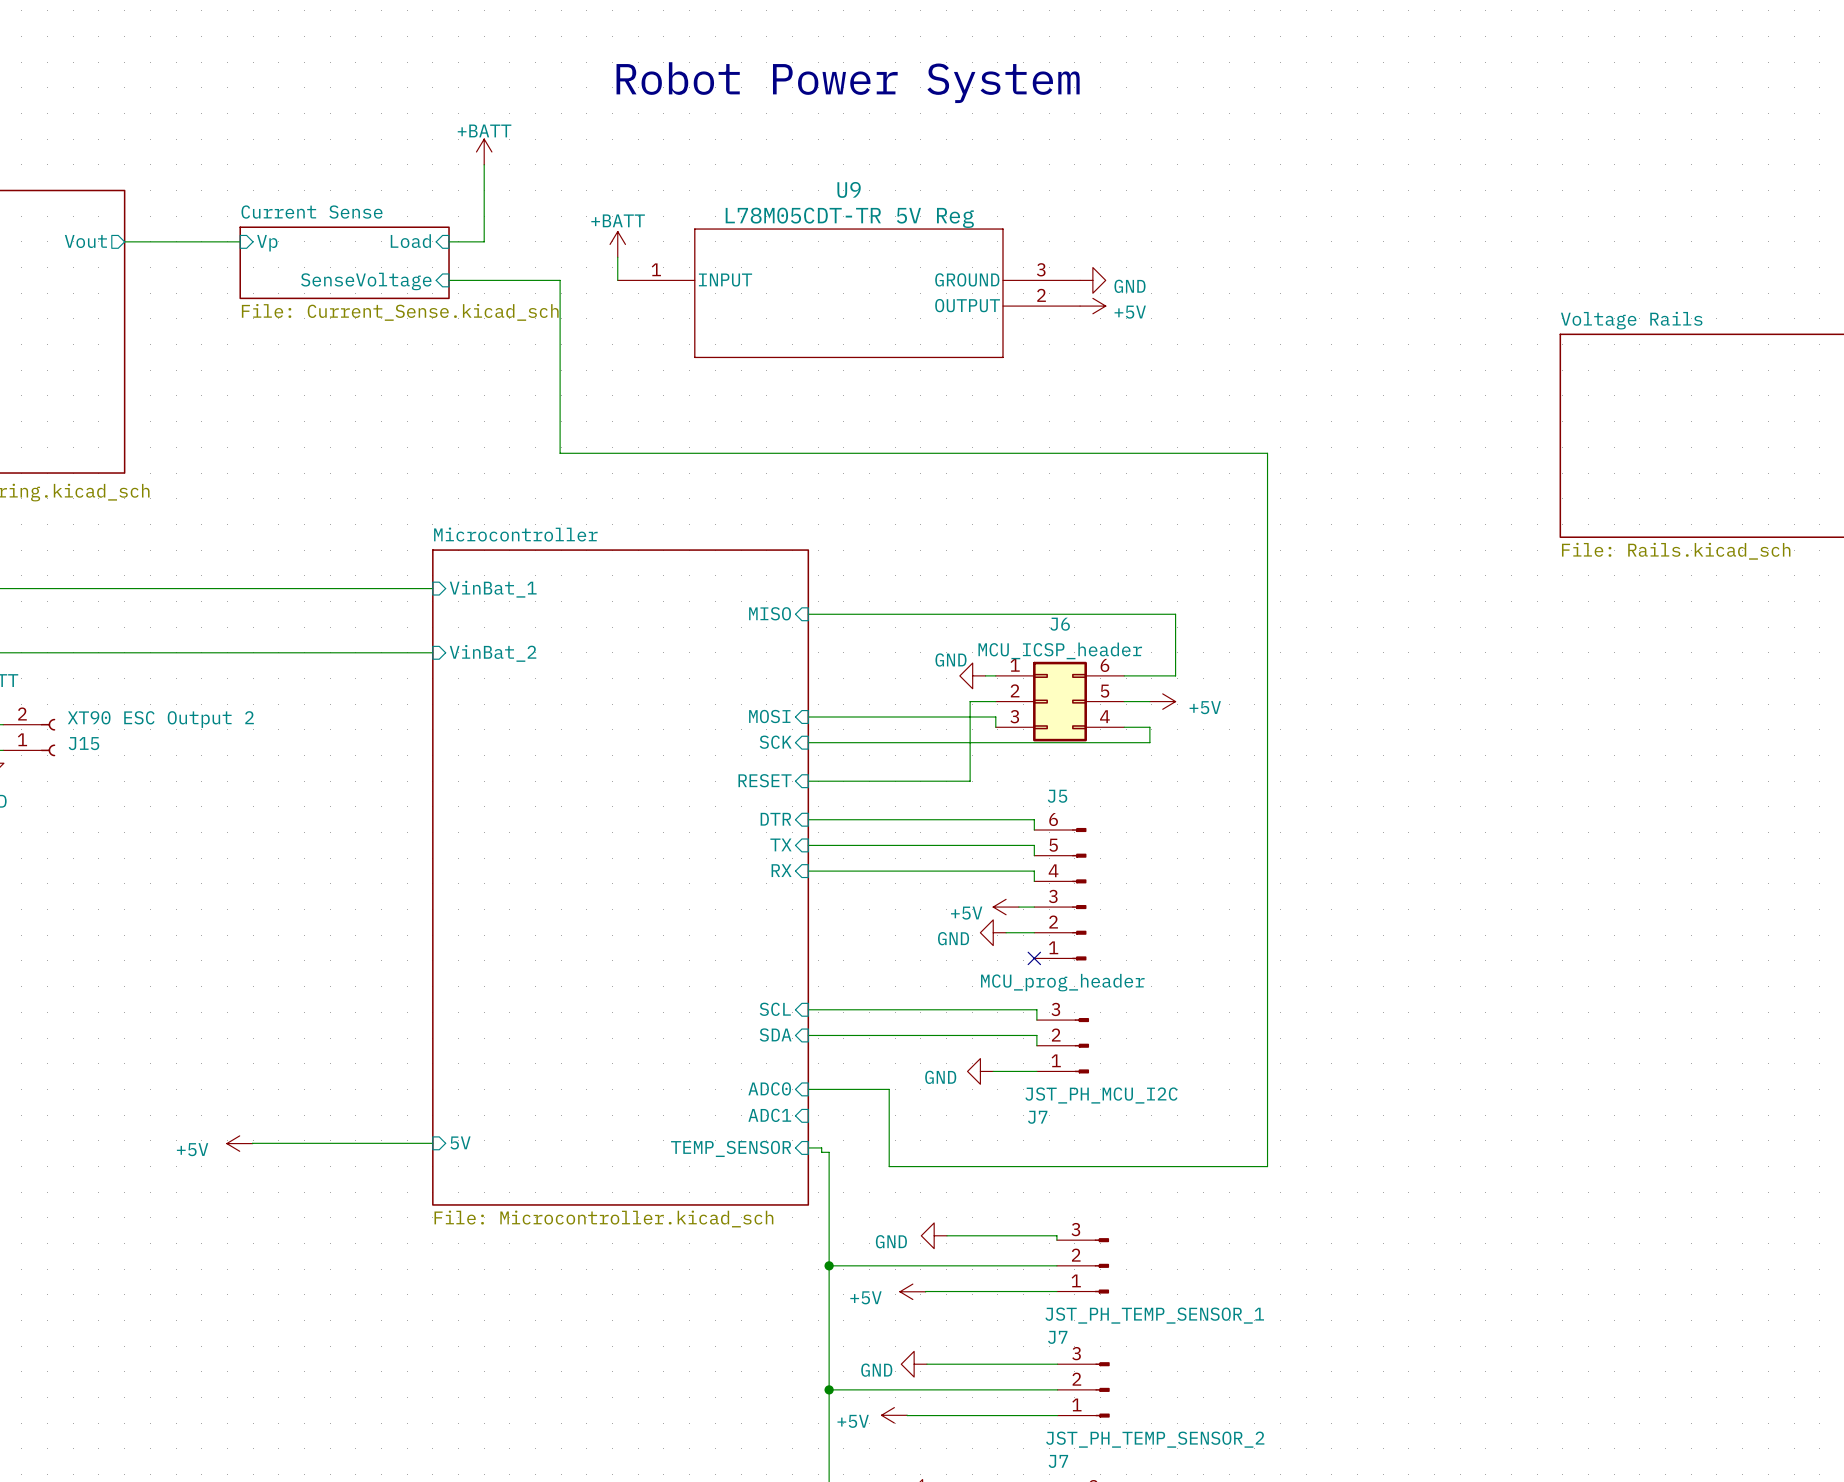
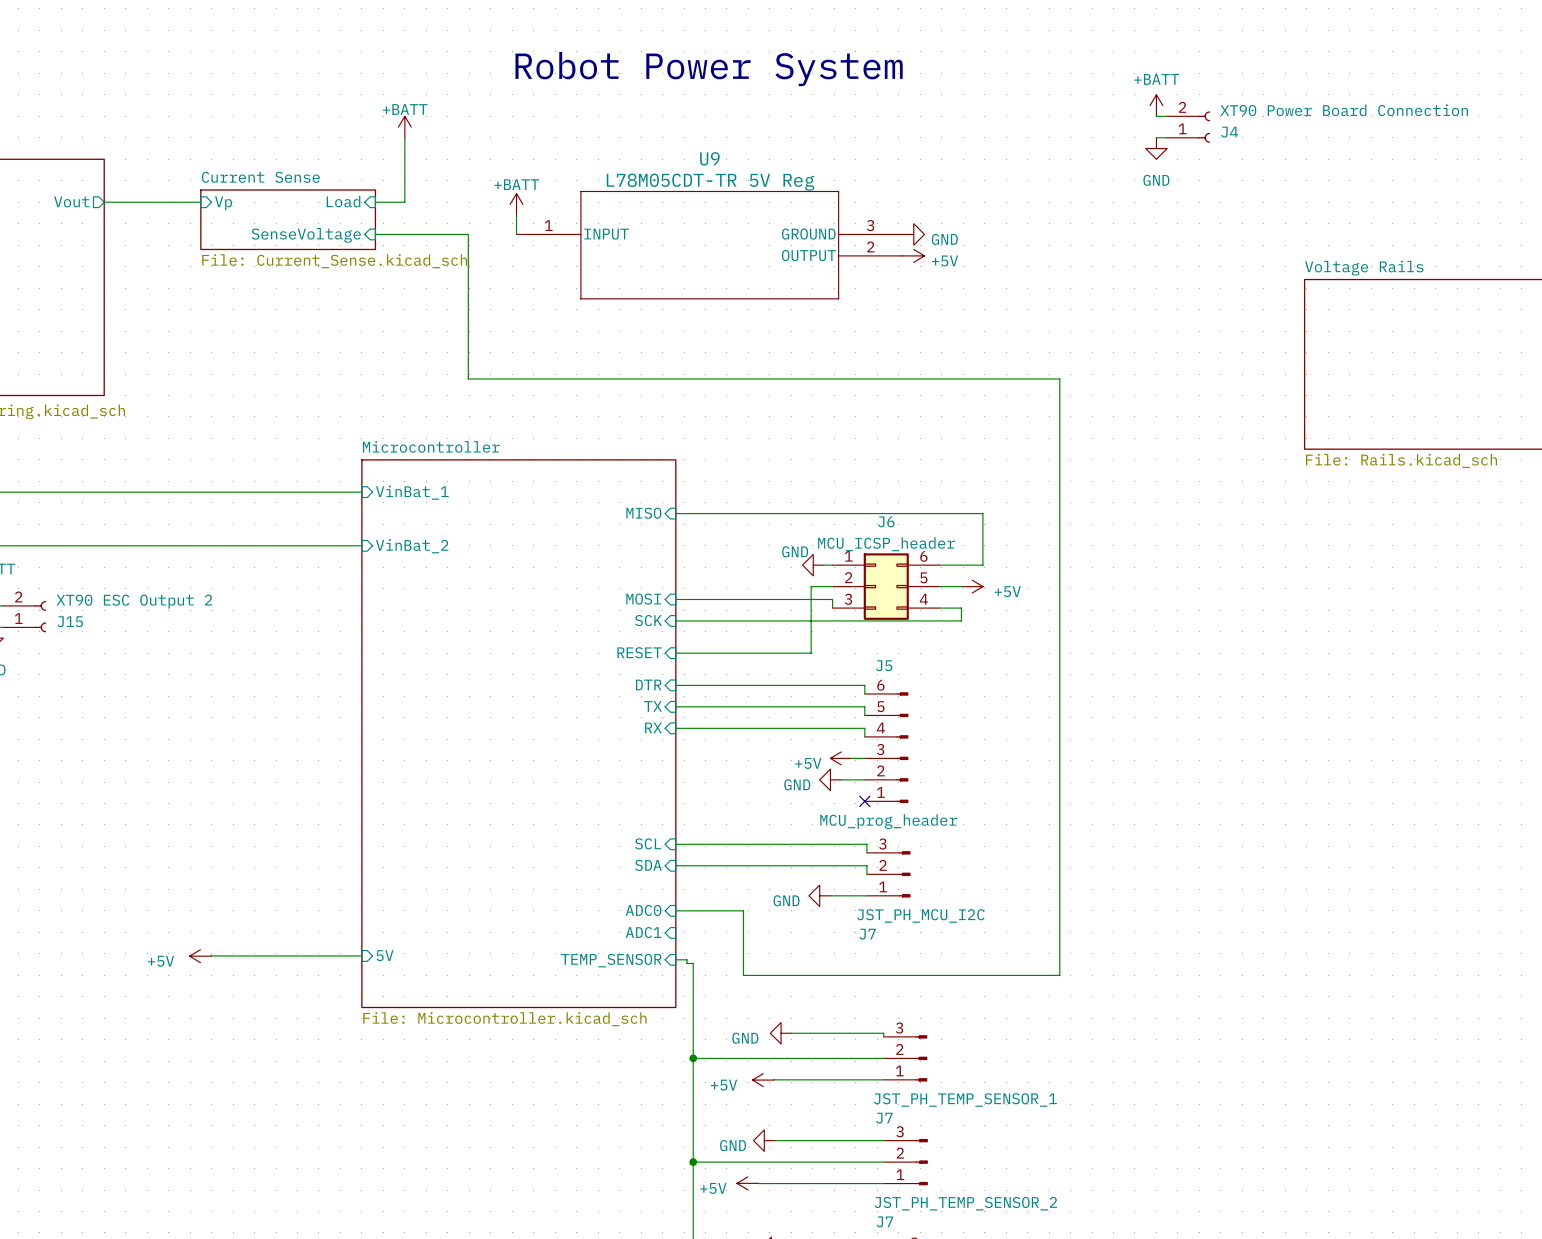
power symbol: none -> +BATT (1156, 105)
wire: none -> (1156, 116) (1166, 116)
J4: none -> XT90 Power Board Connection (1188, 127)
wire: none -> (1156, 137) (1166, 137)
power symbol: none -> GND (1156, 148)

